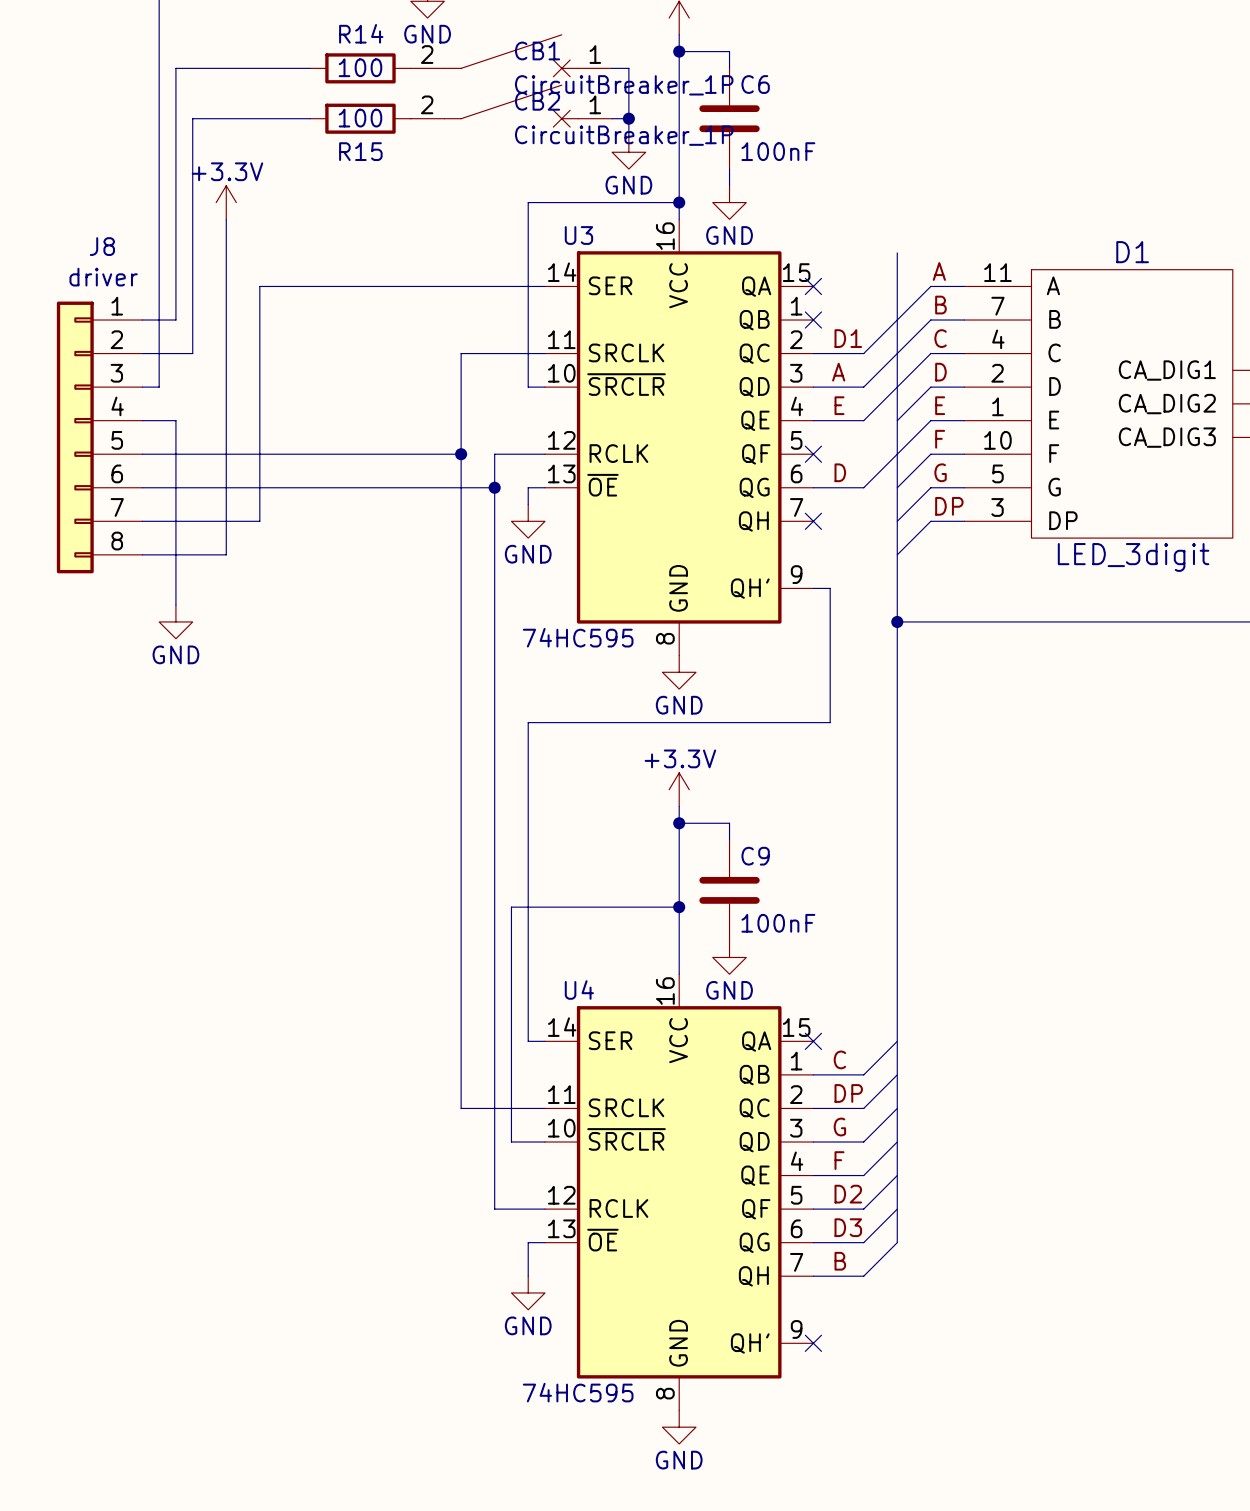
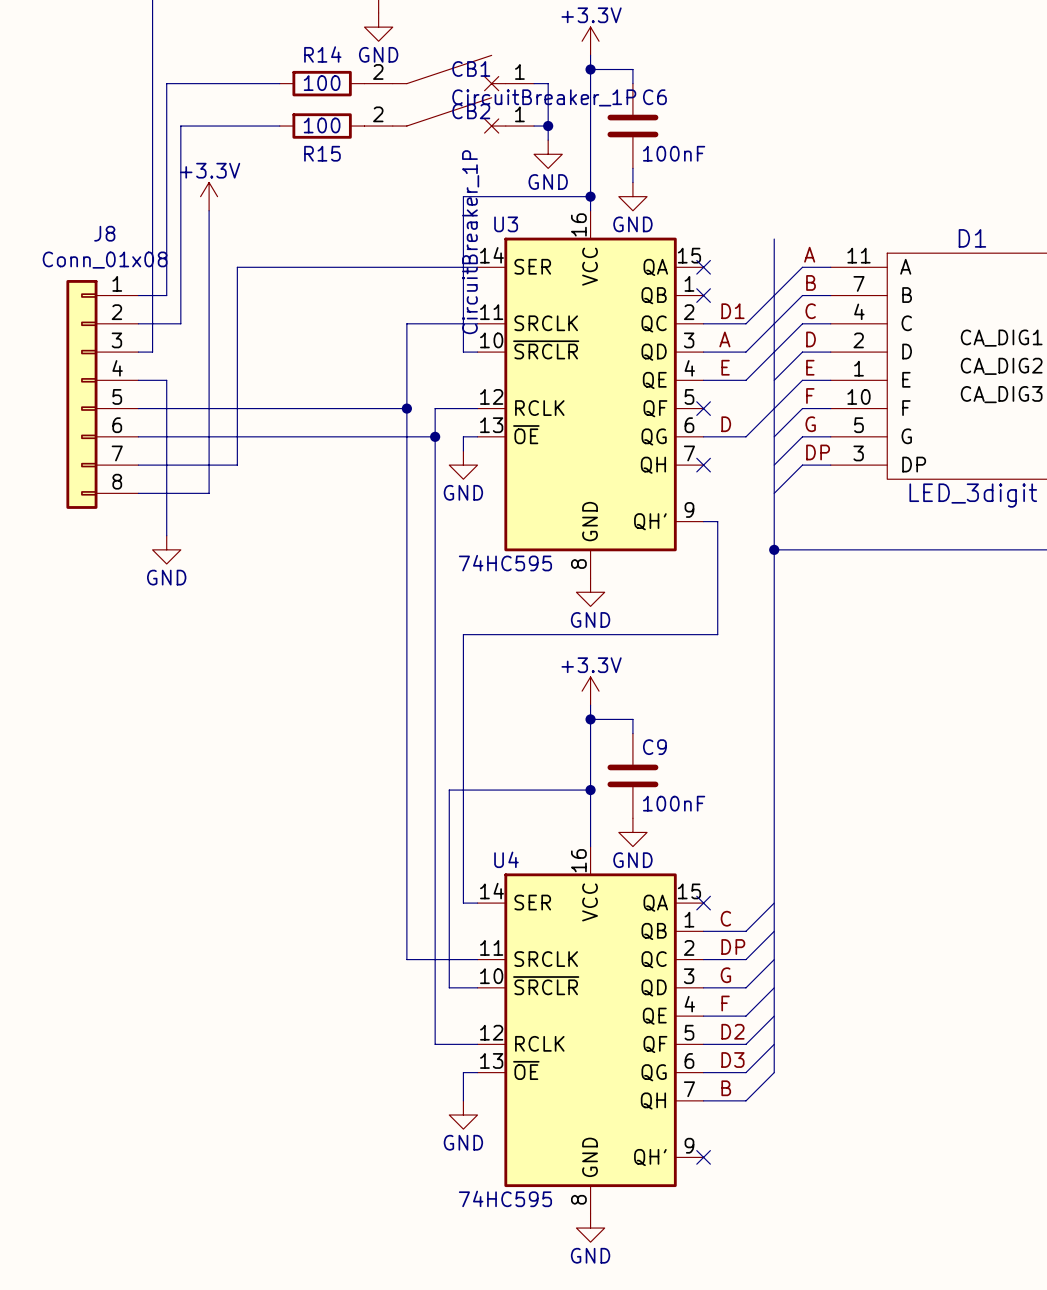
CB2 value rotation: 0° (624, 135) -> 90° counterclockwise (470, 242)
J8 value: driver (103, 277) -> Conn_01x08 (105, 260)

